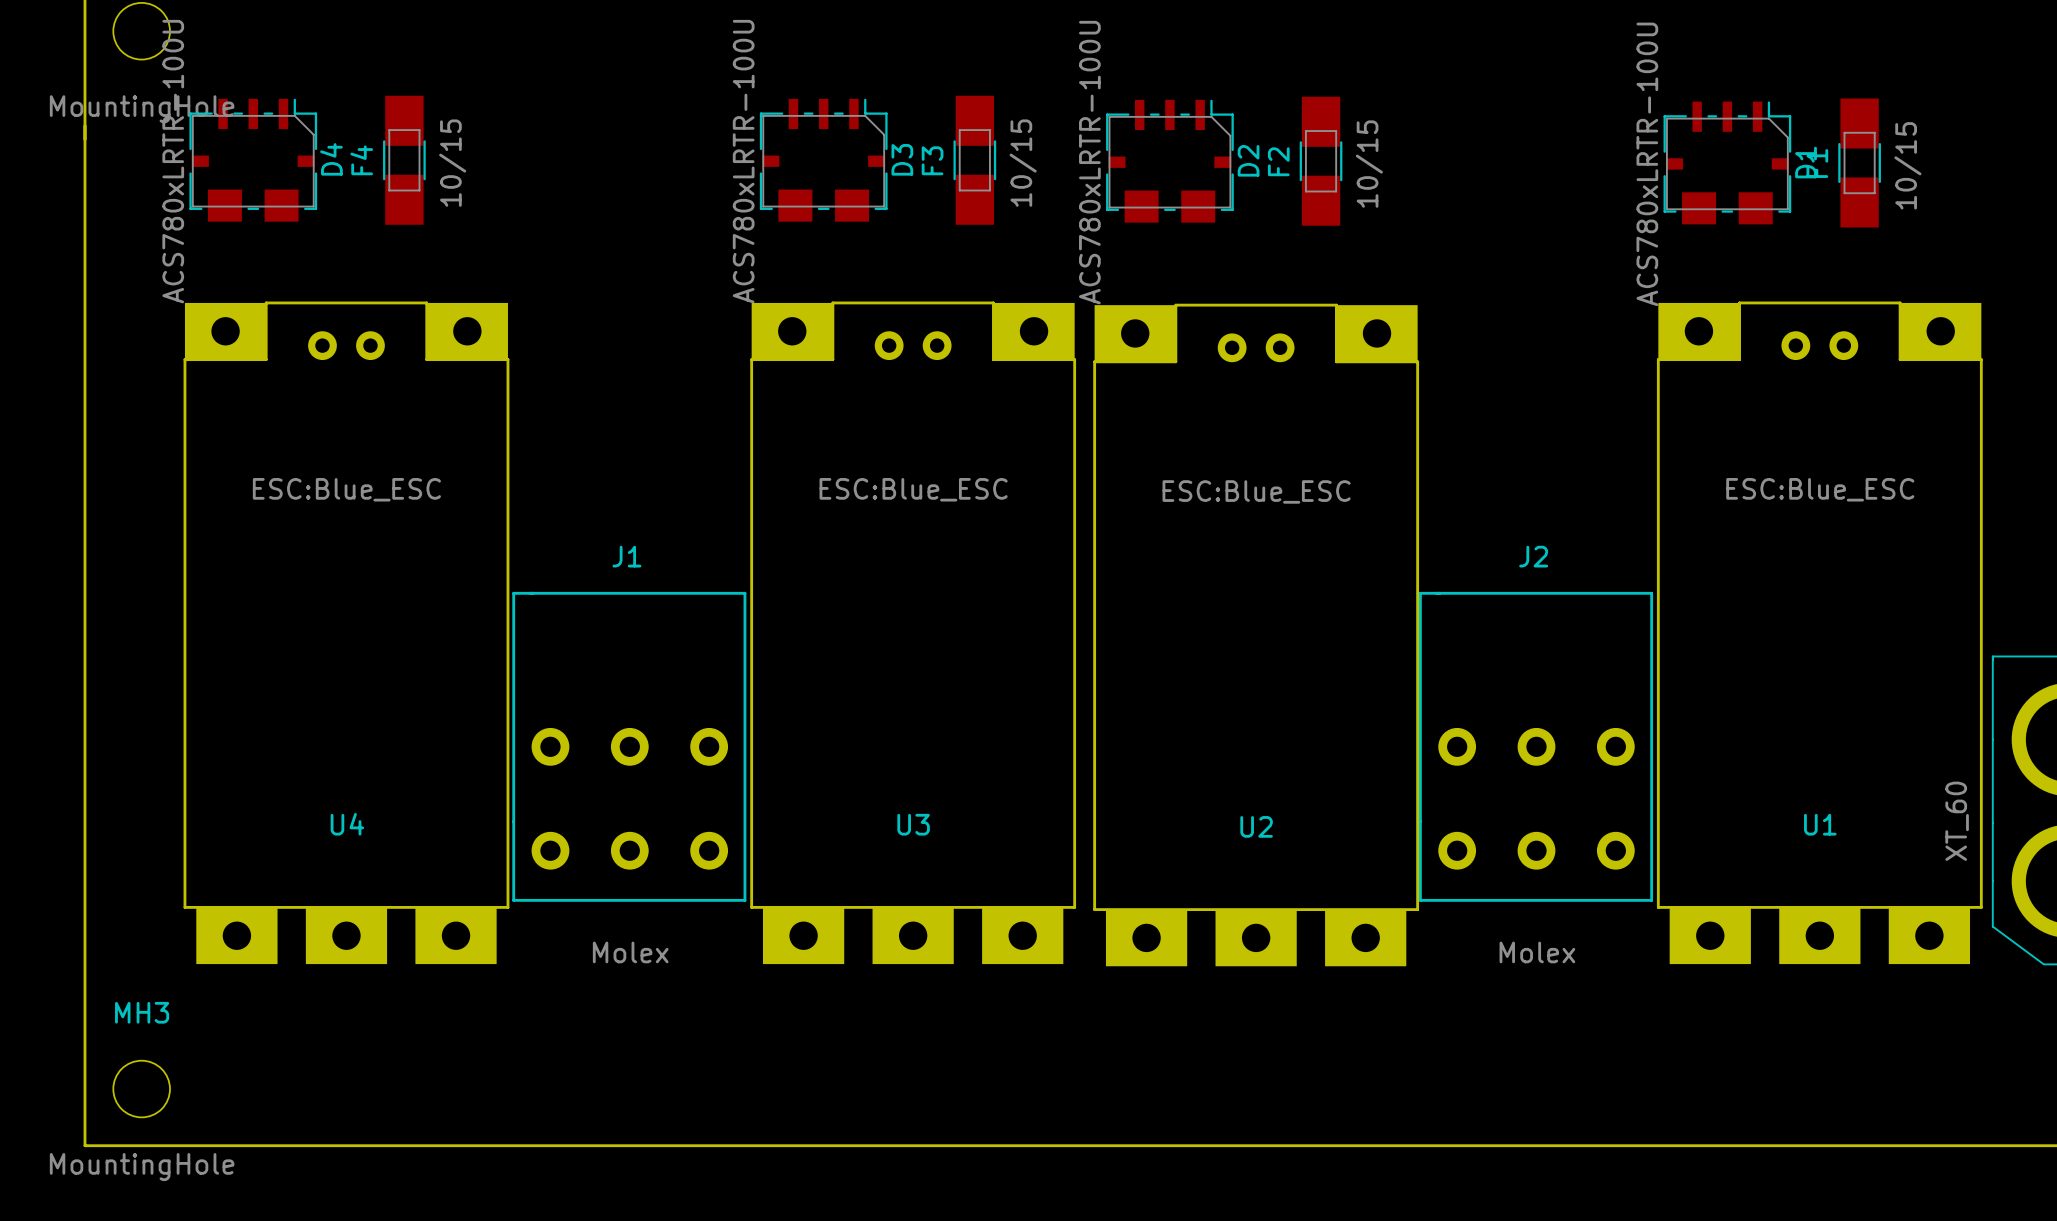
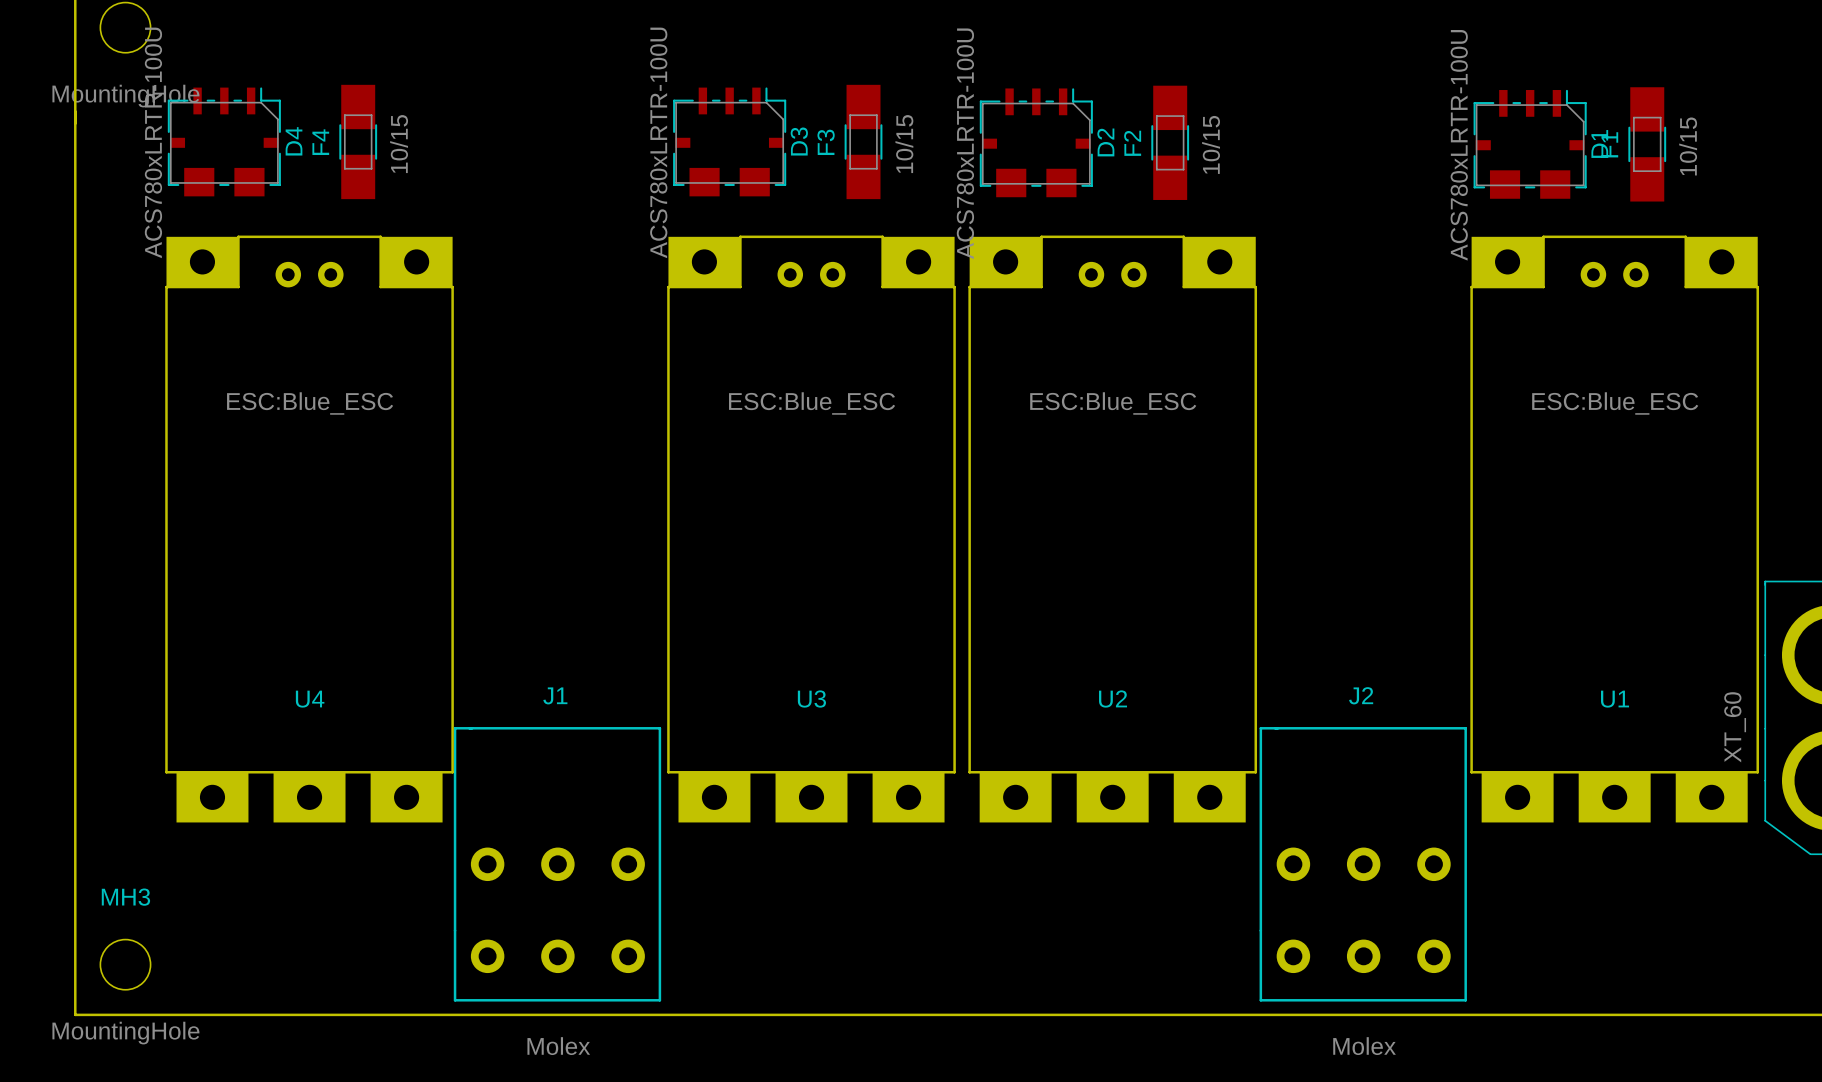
U4 position: (346, 632) -> (309, 529)
U3 position: (913, 632) -> (811, 529)
U1 position: (1819, 632) -> (1614, 529)
U2 position: (1256, 634) -> (1112, 529)
J1 position: (629, 746) -> (557, 864)
J2 position: (1536, 746) -> (1363, 864)

